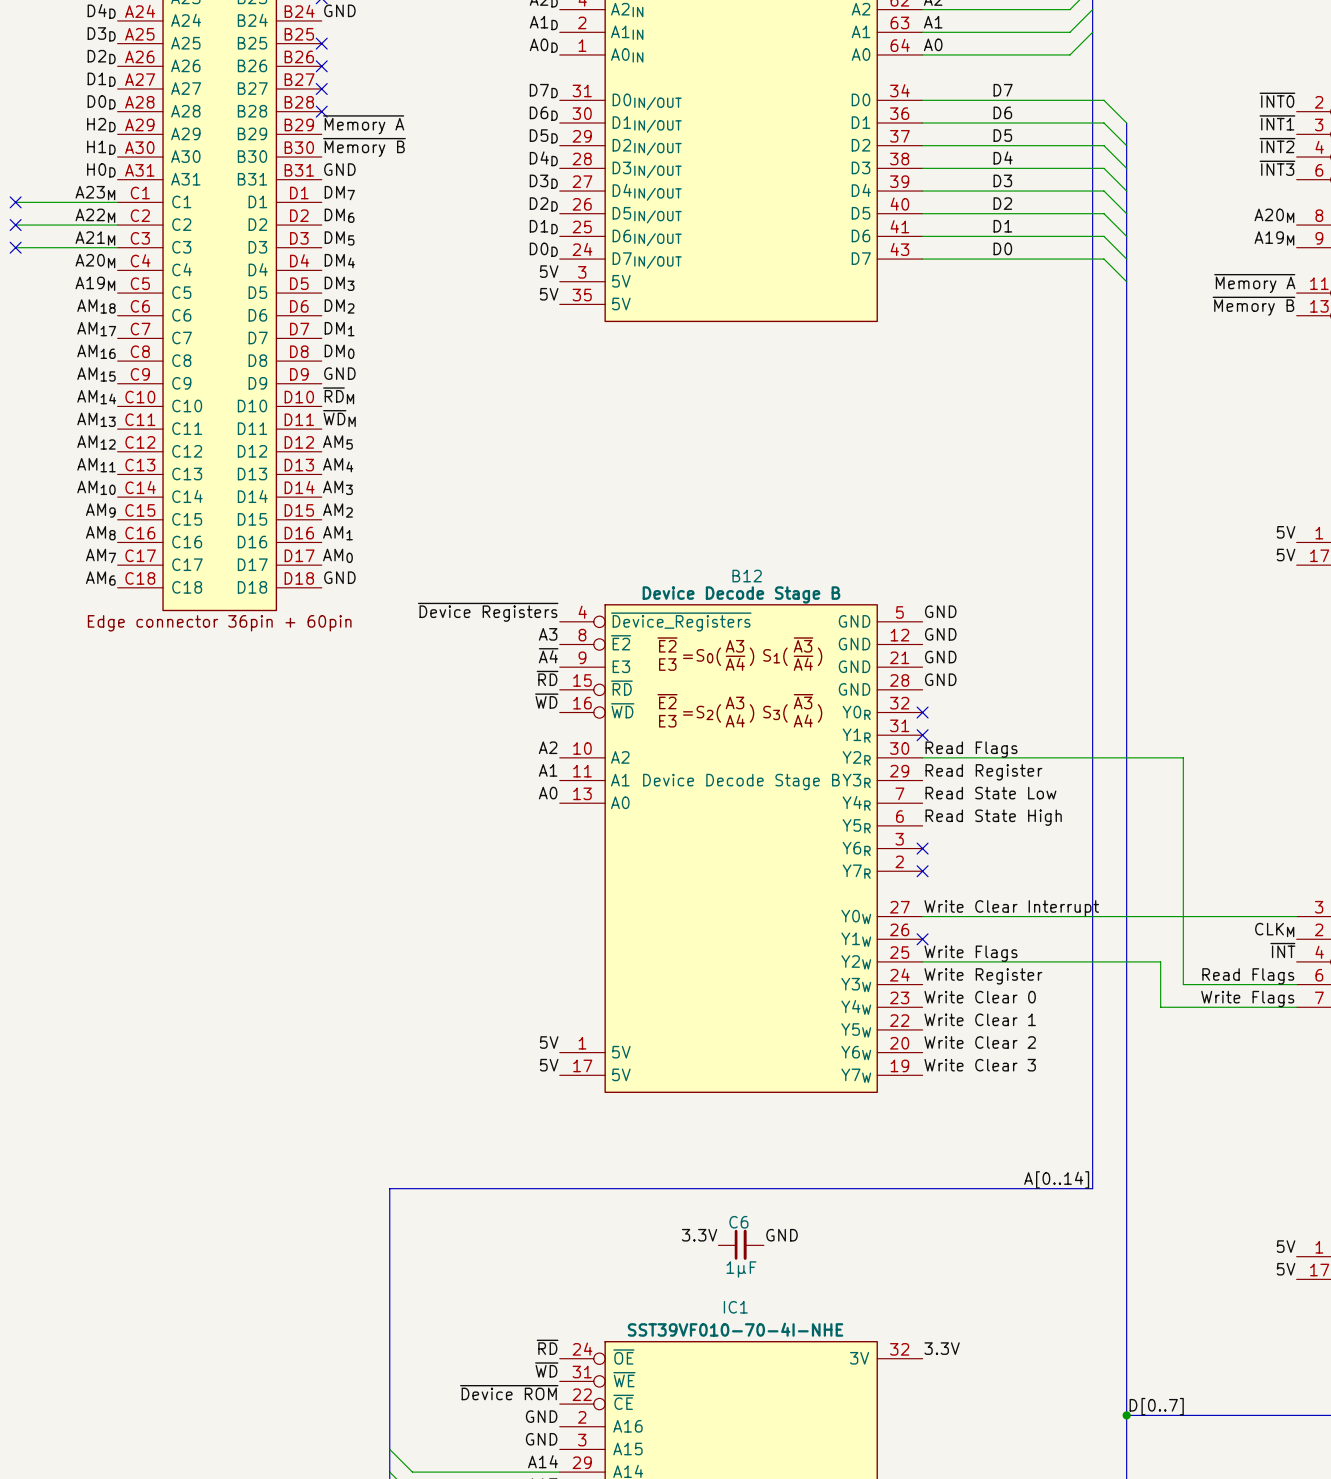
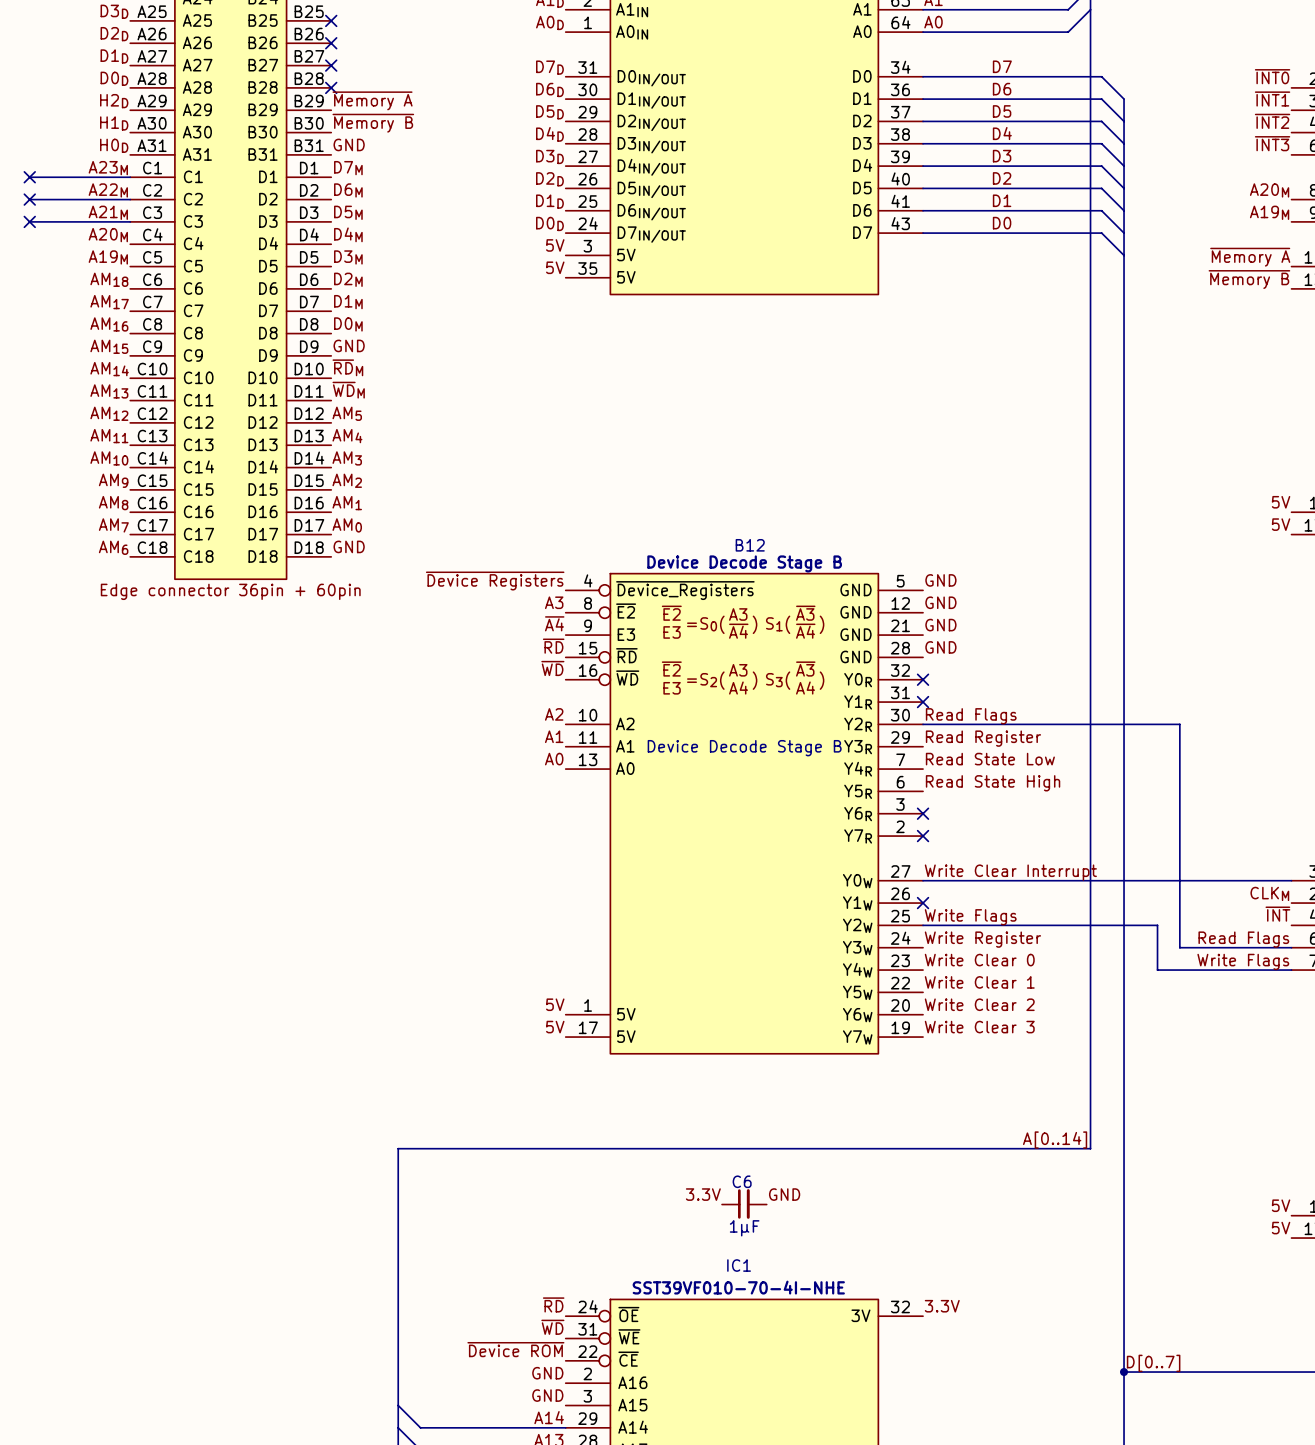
label: DM7 (339, 193) -> D7M (348, 168)
label: DM6 (339, 215) -> D6M (348, 190)
label: DM5 (339, 238) -> D5M (348, 212)
label: DM4 (339, 261) -> D4M (348, 234)
label: DM3 (339, 283) -> D3M (348, 257)
label: DM2 (339, 306) -> D2M (348, 279)
label: DM1 (339, 329) -> D1M (348, 302)
label: DM0 (339, 351) -> D0M (348, 324)

